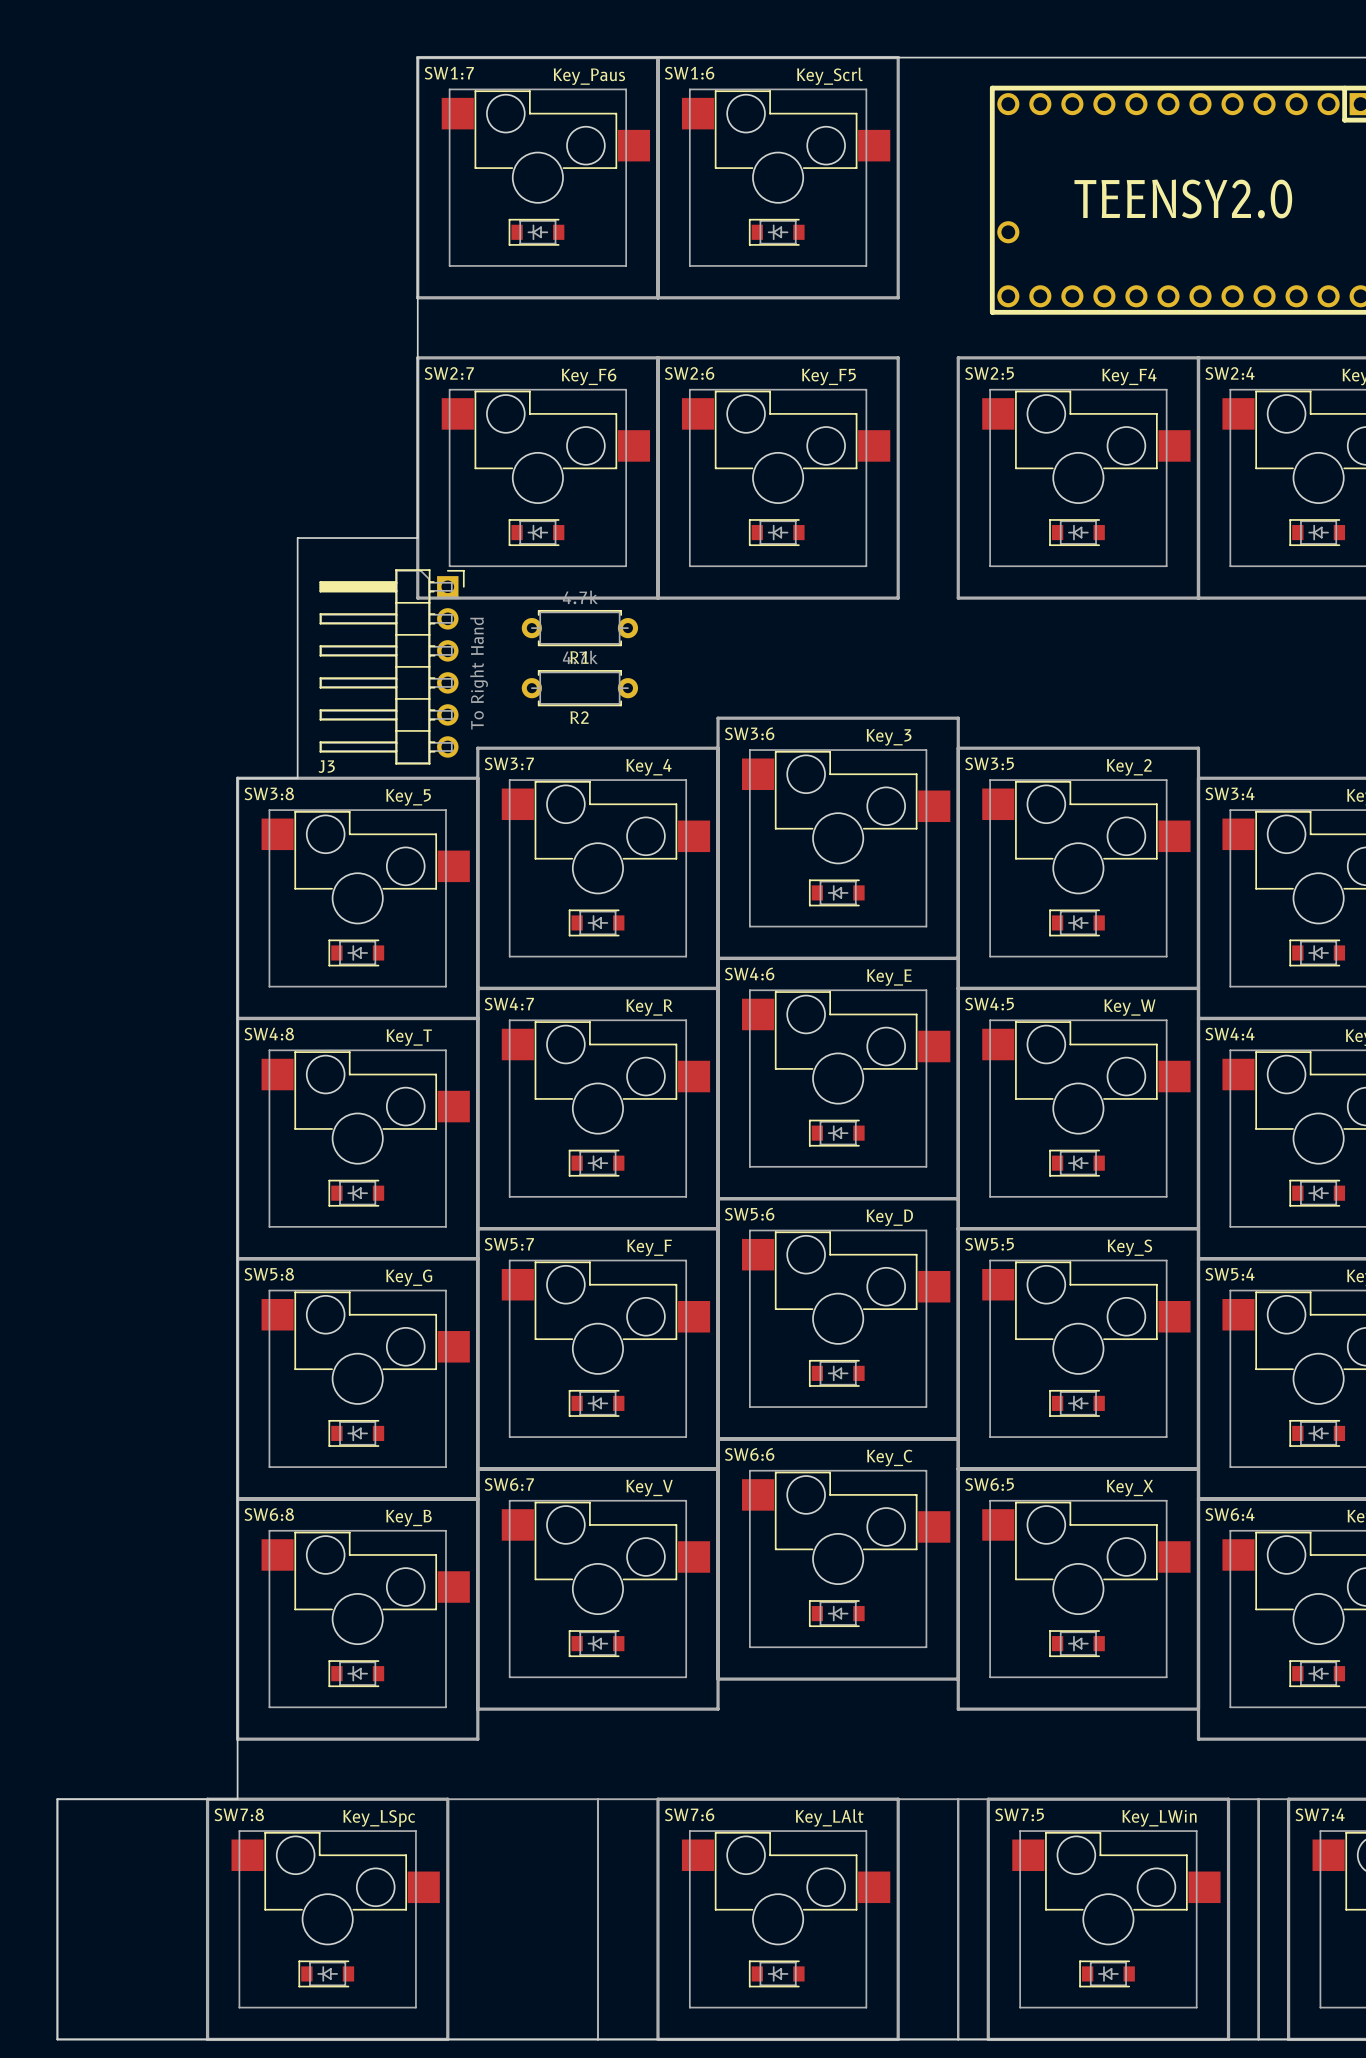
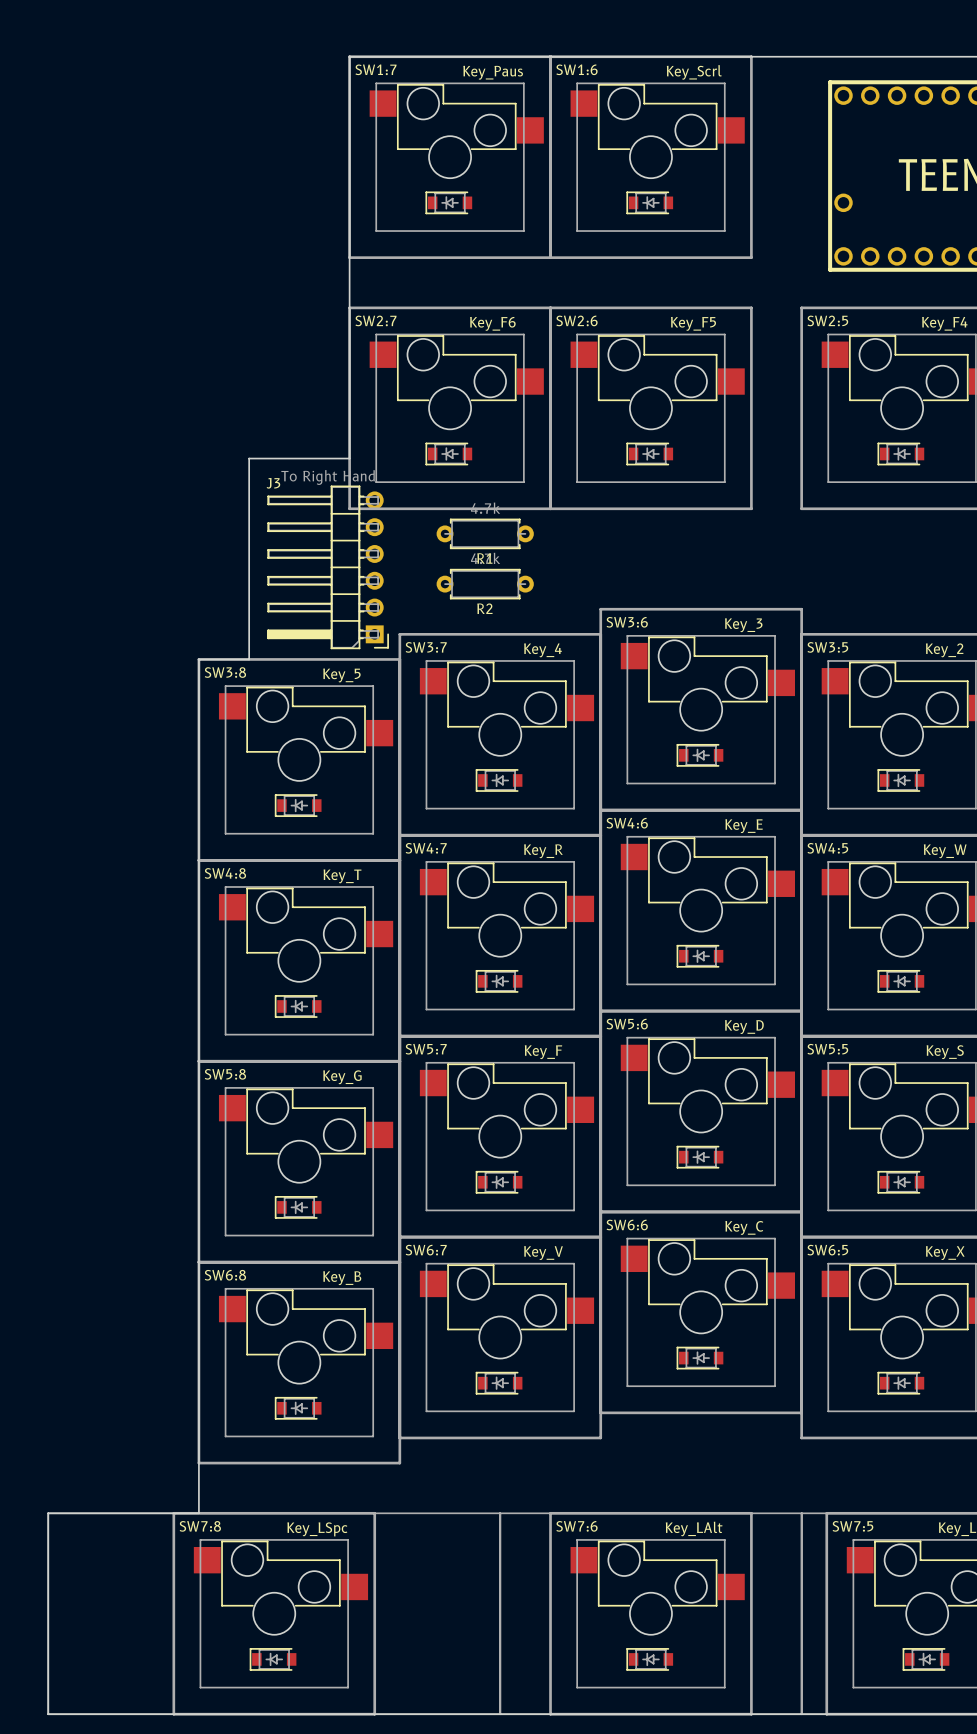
J3 footprint: [319, 569, 465, 765] -> [267, 485, 389, 650]
J3 value position: To Right Hand (479, 673) -> To Right Hand (328, 477)
J3 name position: J3 (326, 766) -> J3 (273, 483)

